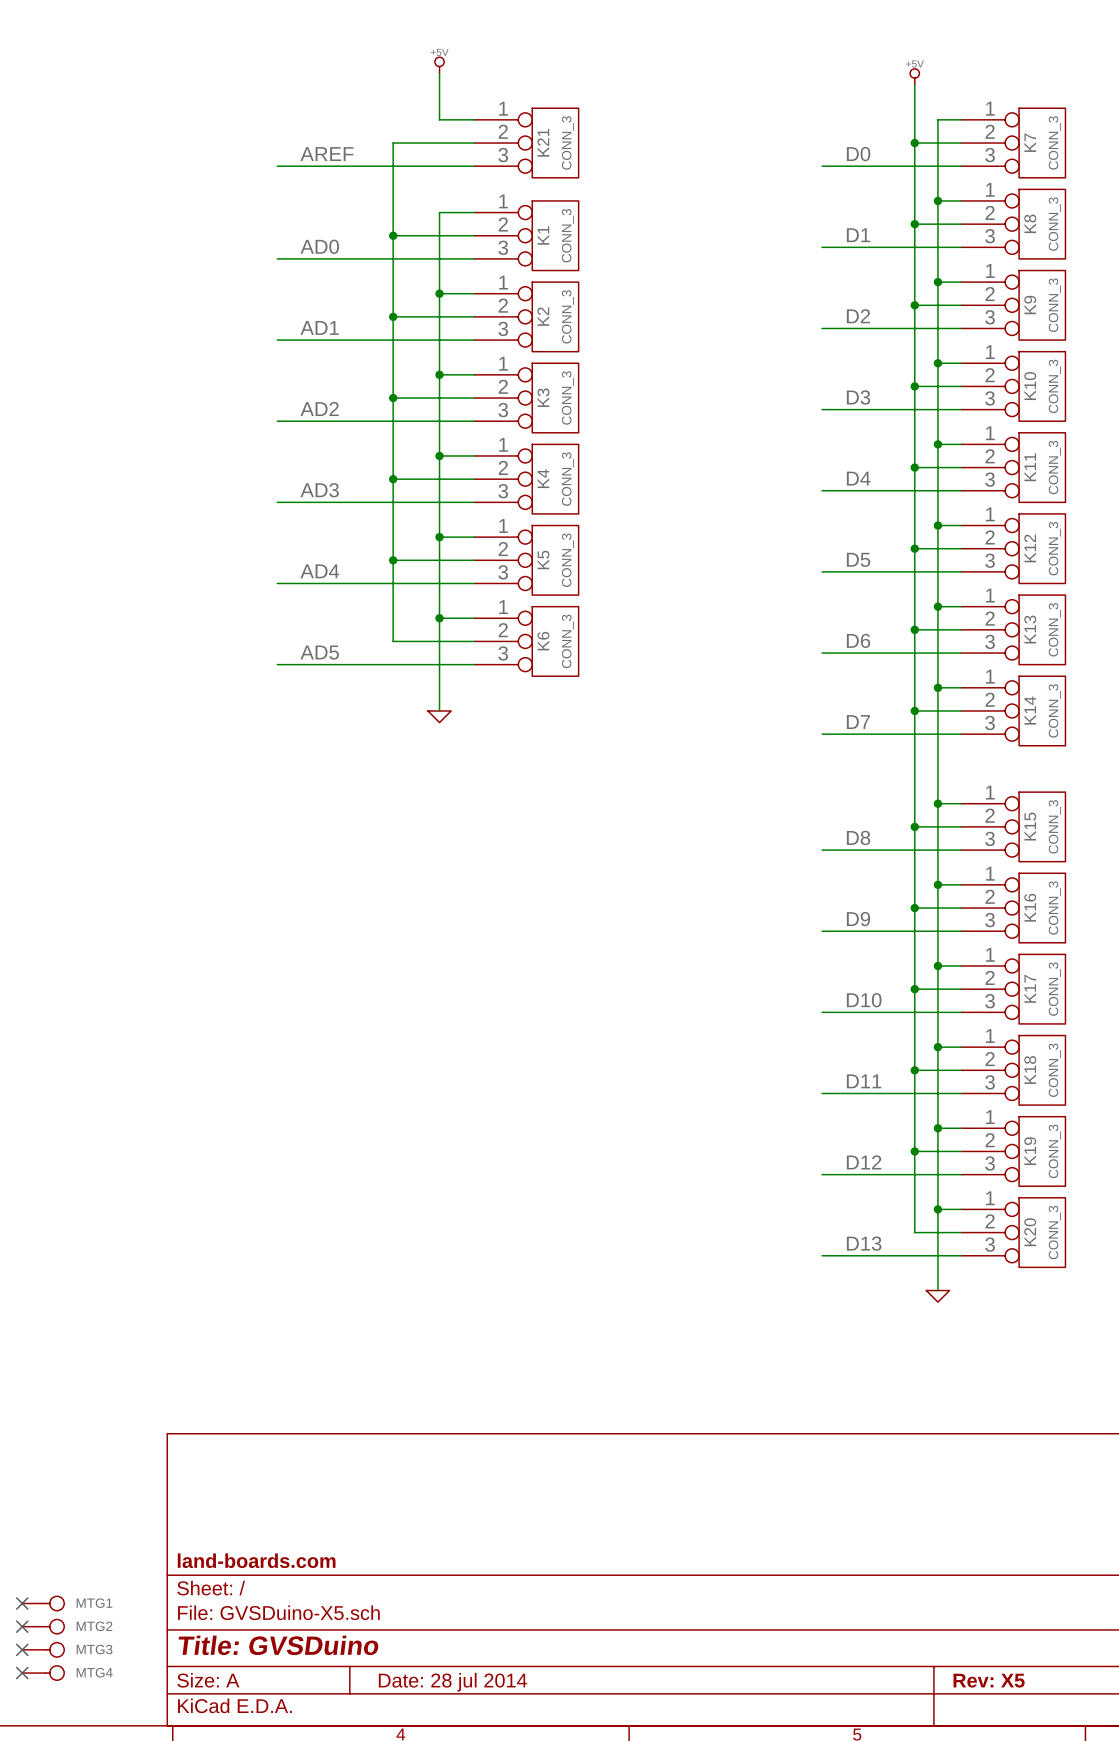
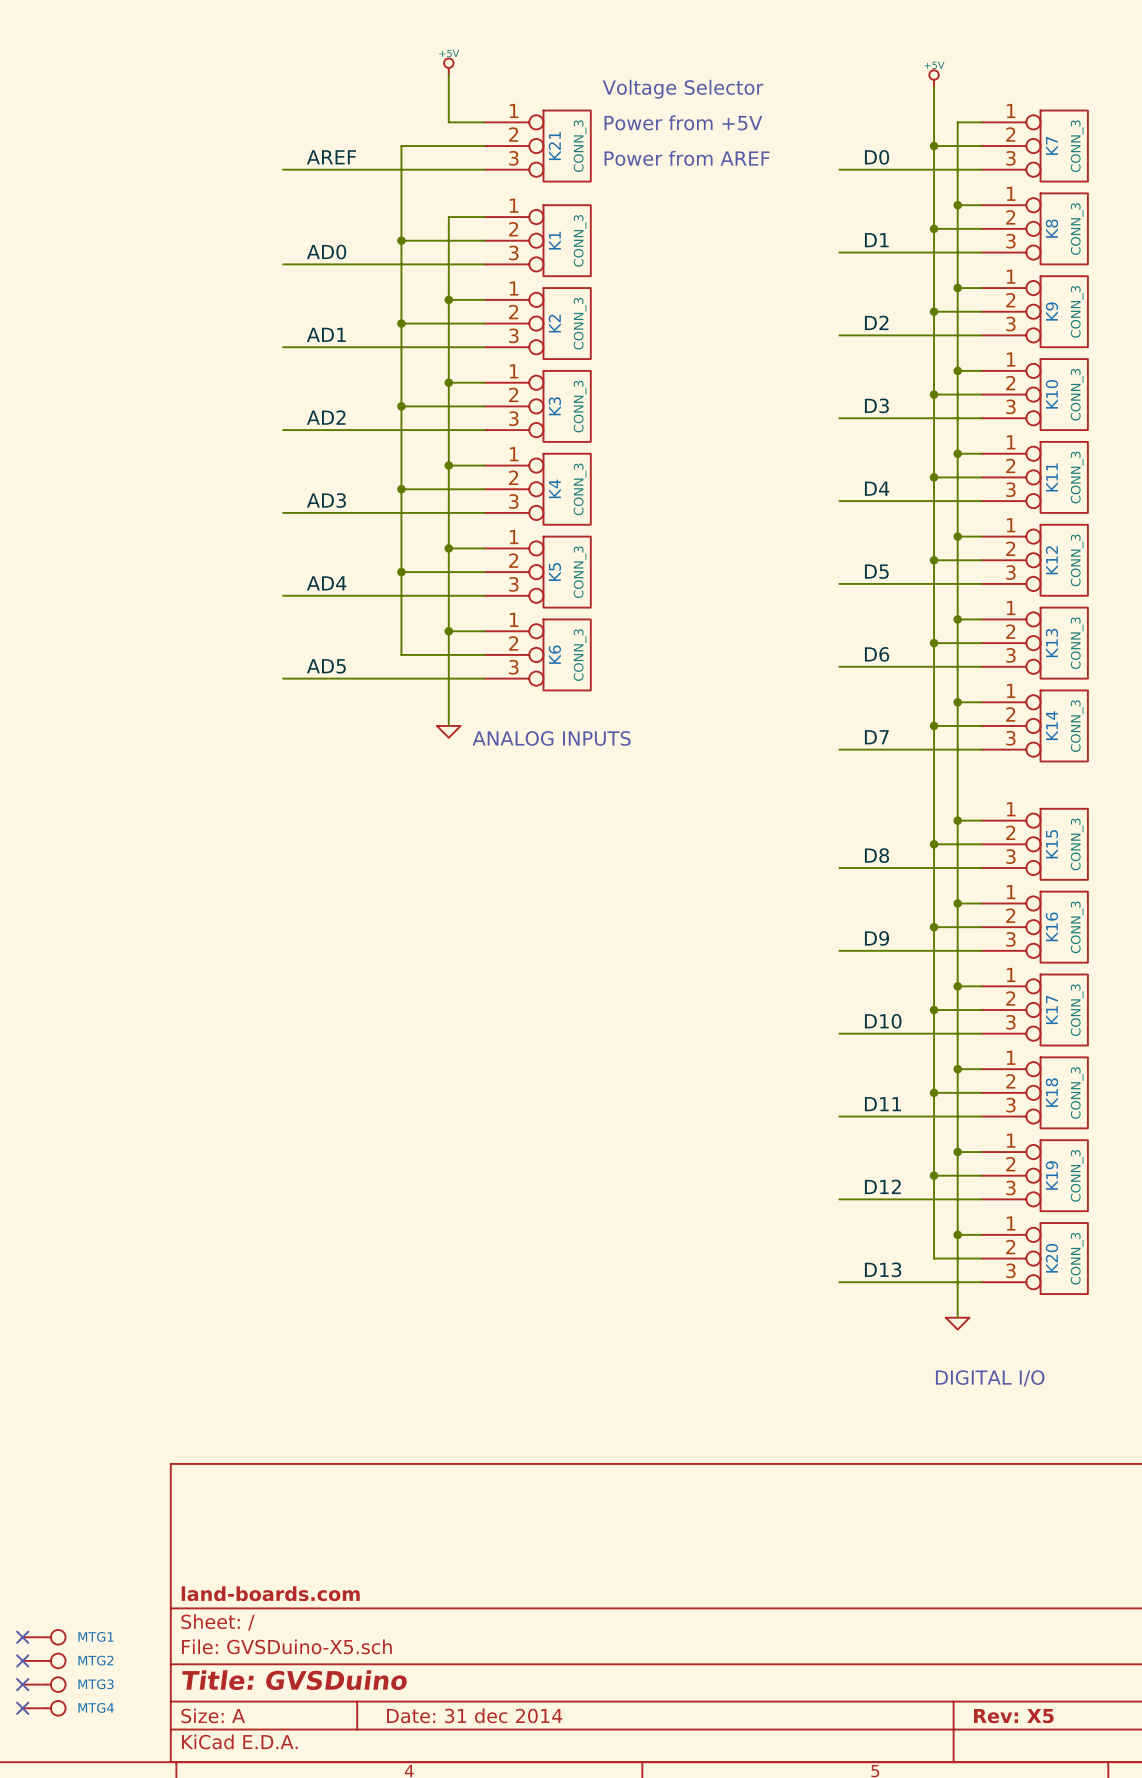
text: none -> Voltage Selector (683, 89)
text: none -> Power from +5V (683, 122)
text: none -> Power from AREF (687, 158)
text: none -> ANALOG INPUTS (551, 738)
text: none -> DIGITAL I/O (990, 1378)
title block: Date: 28 jul 2014 (452, 1682) -> Date: 31 dec 2014 (474, 1715)

